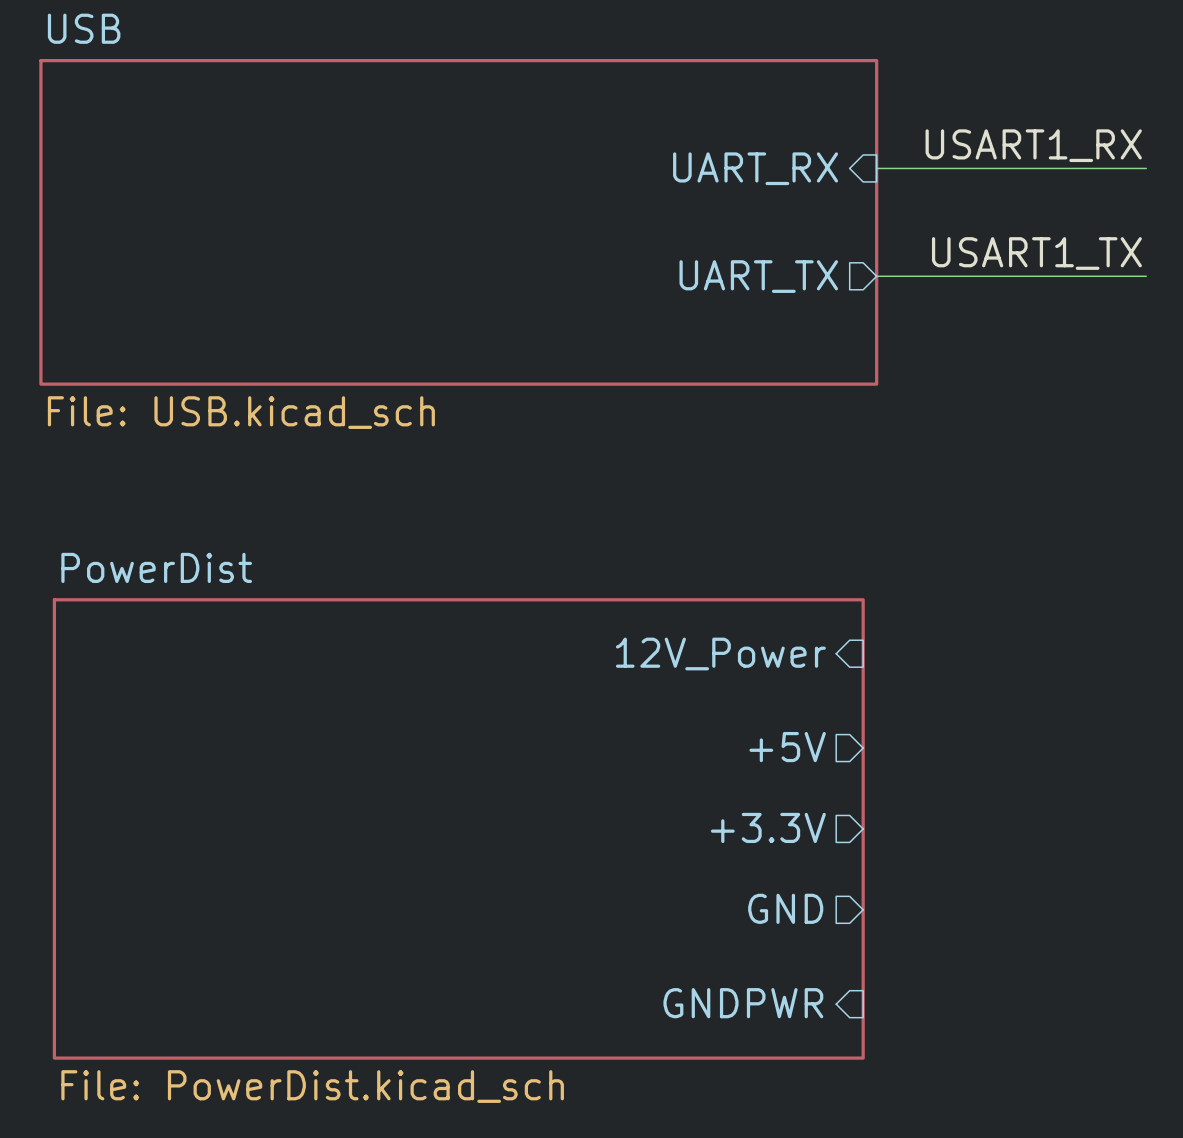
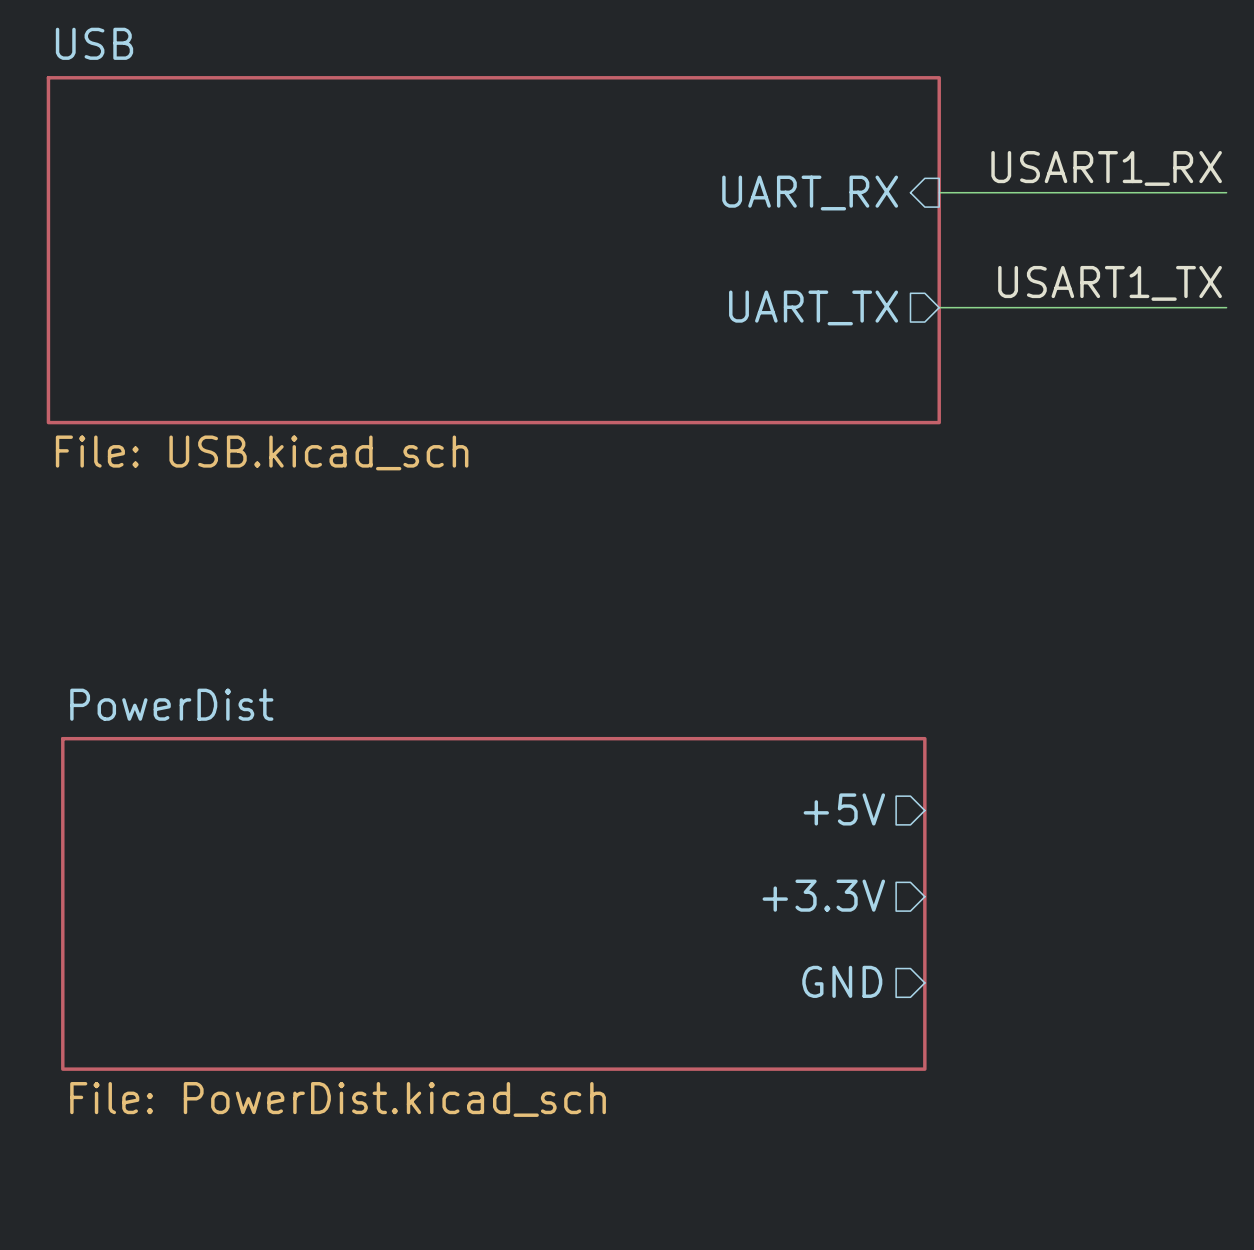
sheet PowerDist name position: PowerDist (156, 567) -> PowerDist (171, 704)
sheet PowerDist shape: [52, 598, 865, 1060] -> [61, 736, 927, 1071]
sheet pin: 12V_Power (720, 653) -> none
sheet pin: GNDPWR (743, 1003) -> none
sheet PowerDist value position: File: PowerDist.kicad_sch (312, 1086) -> File: PowerDist.kicad_sch (338, 1099)

